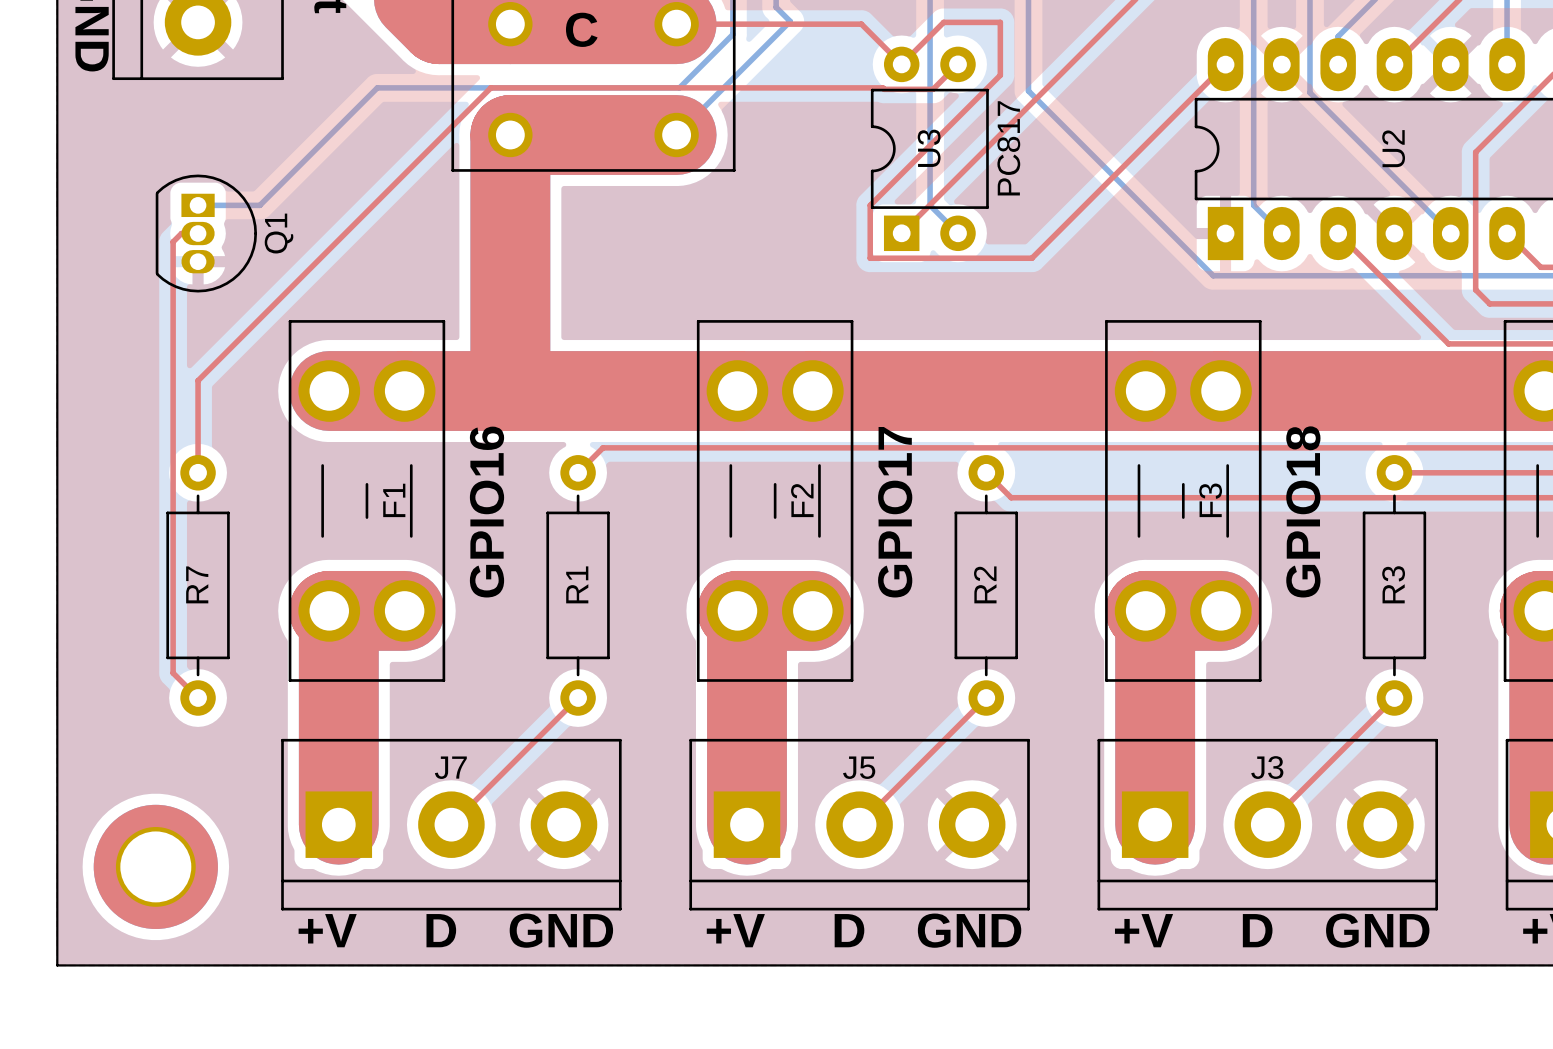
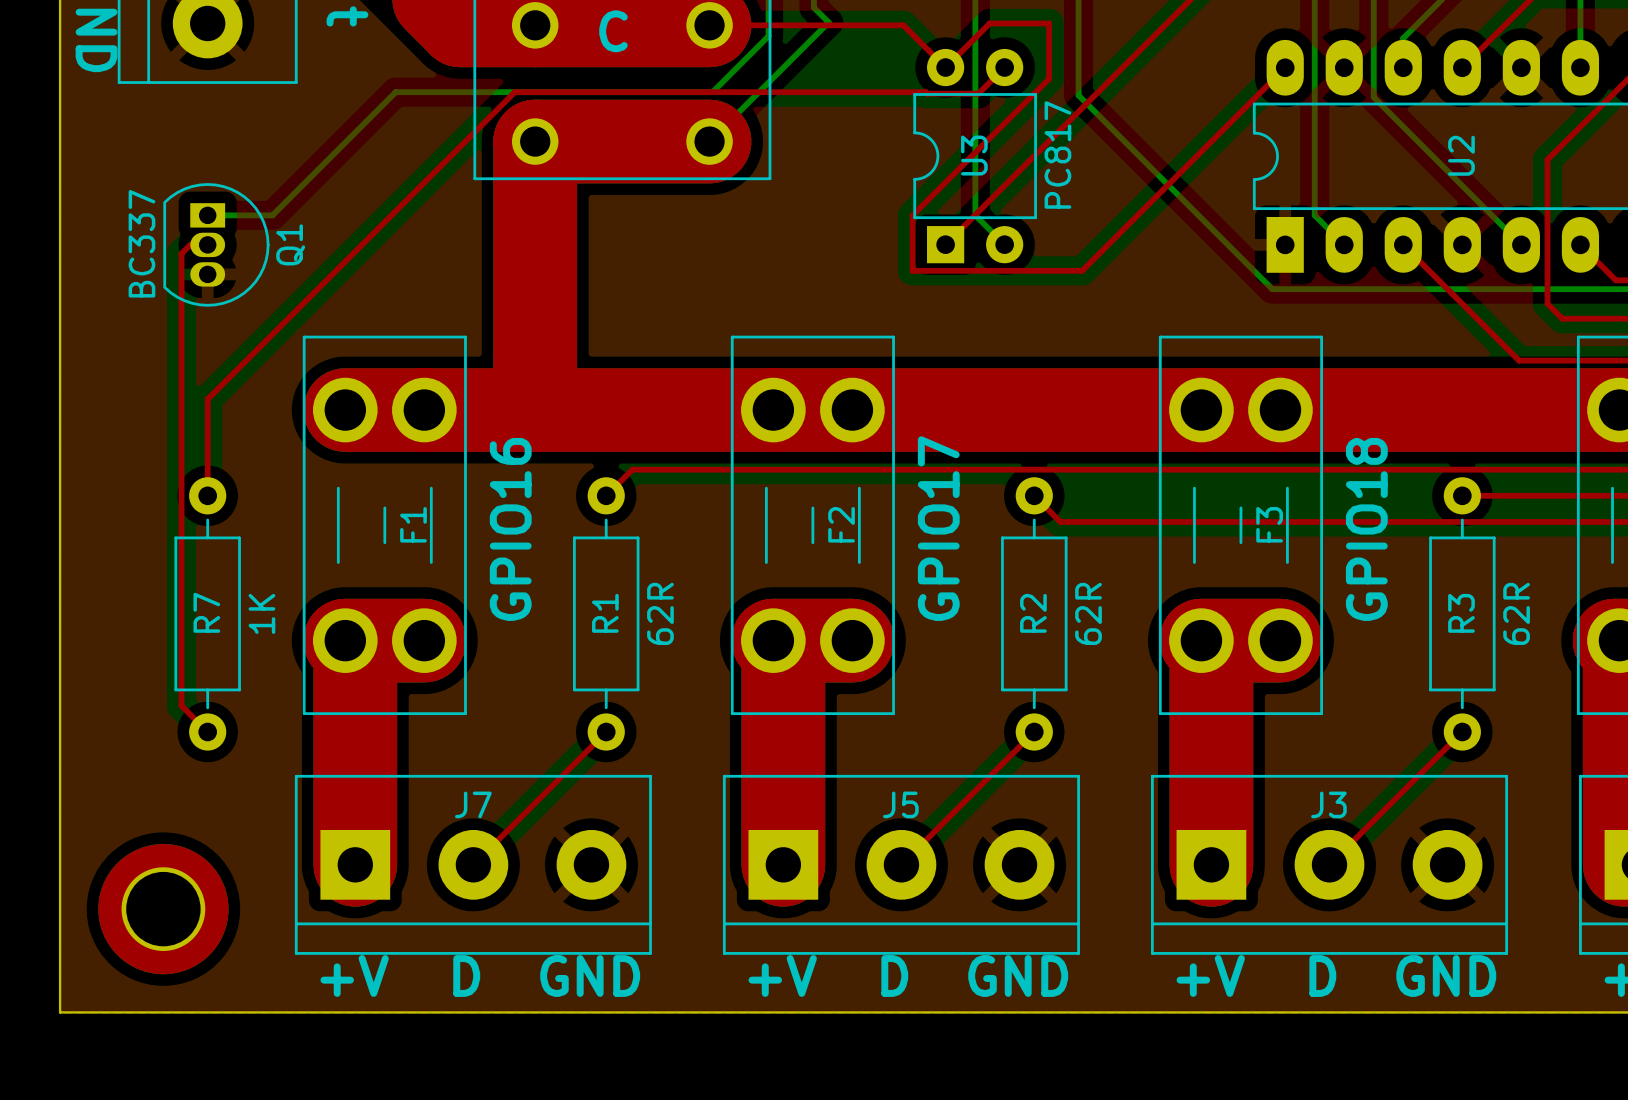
Q1 value: none -> BC337 (141, 243)
R7 value: none -> 1K (261, 613)
R1 value: none -> 62R (660, 613)
R2 value: none -> 62R (1088, 613)
R3 value: none -> 62R (1516, 613)

